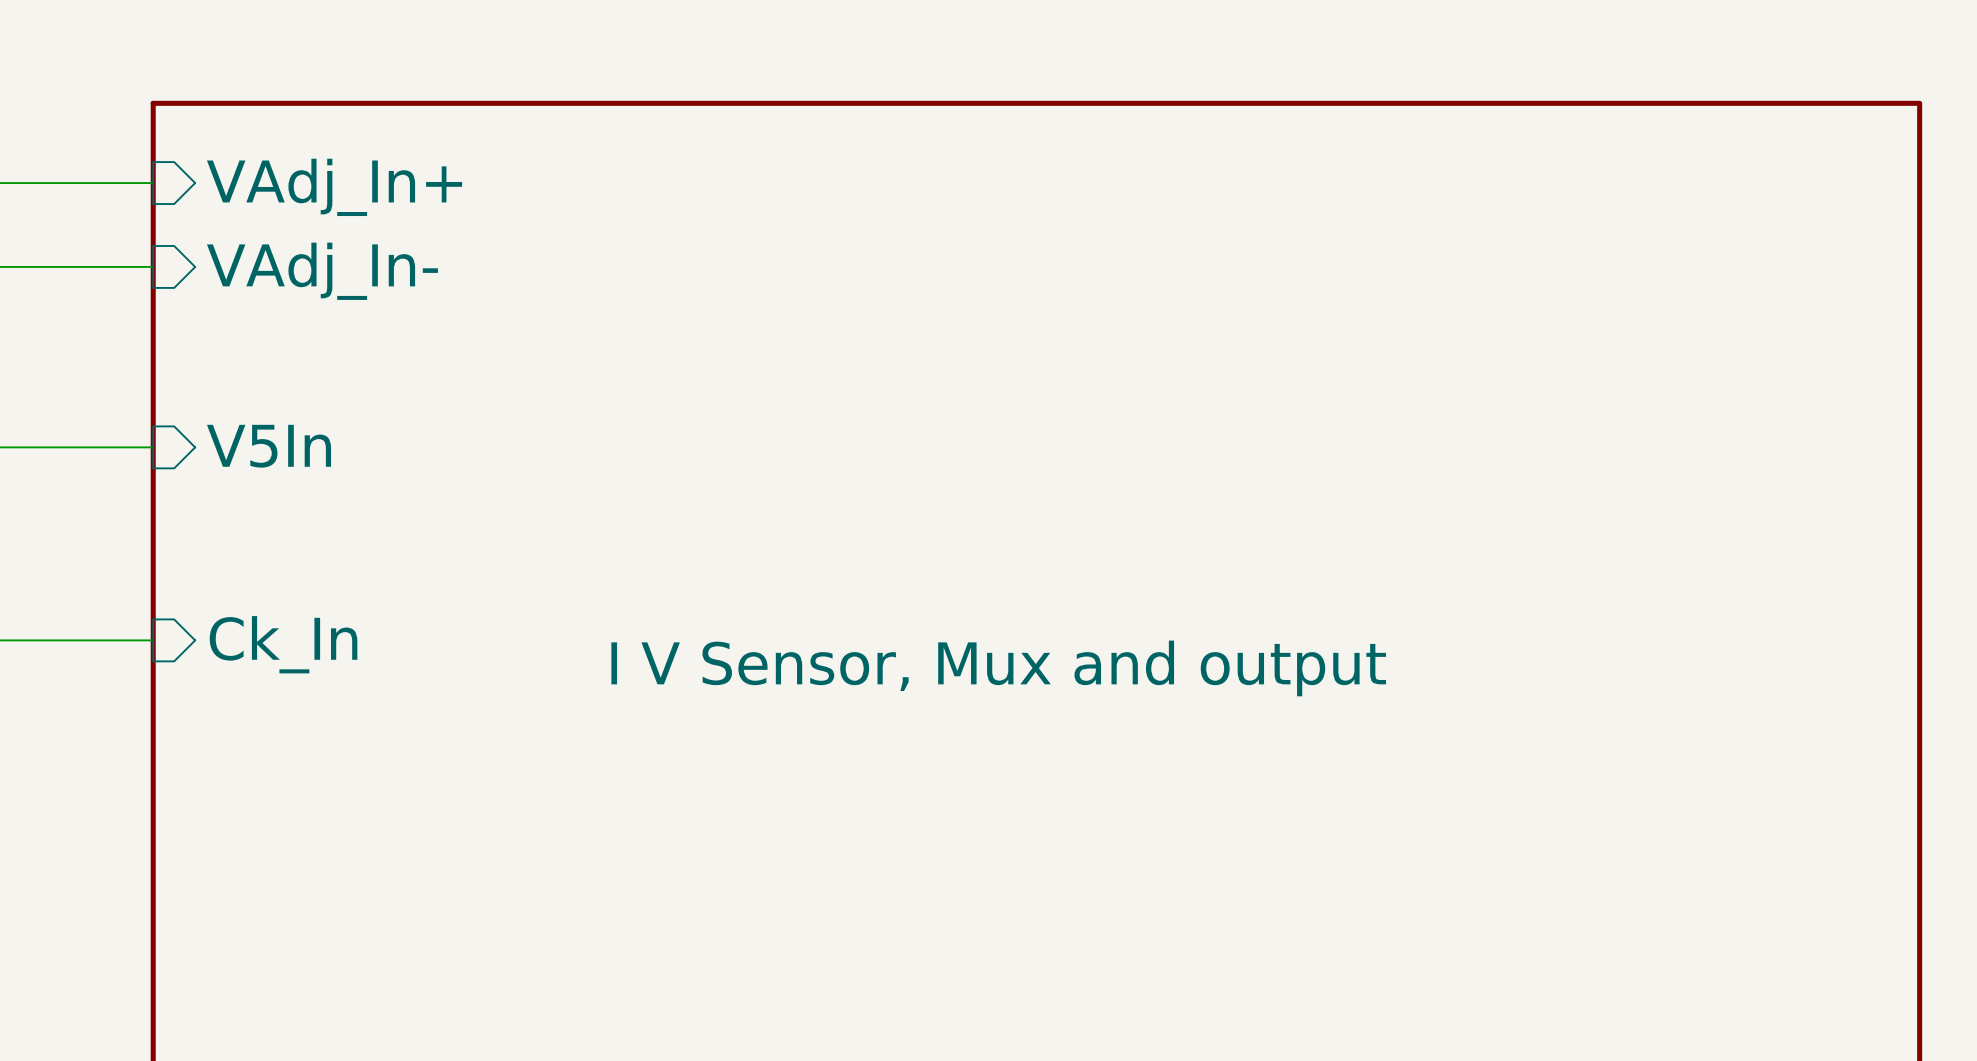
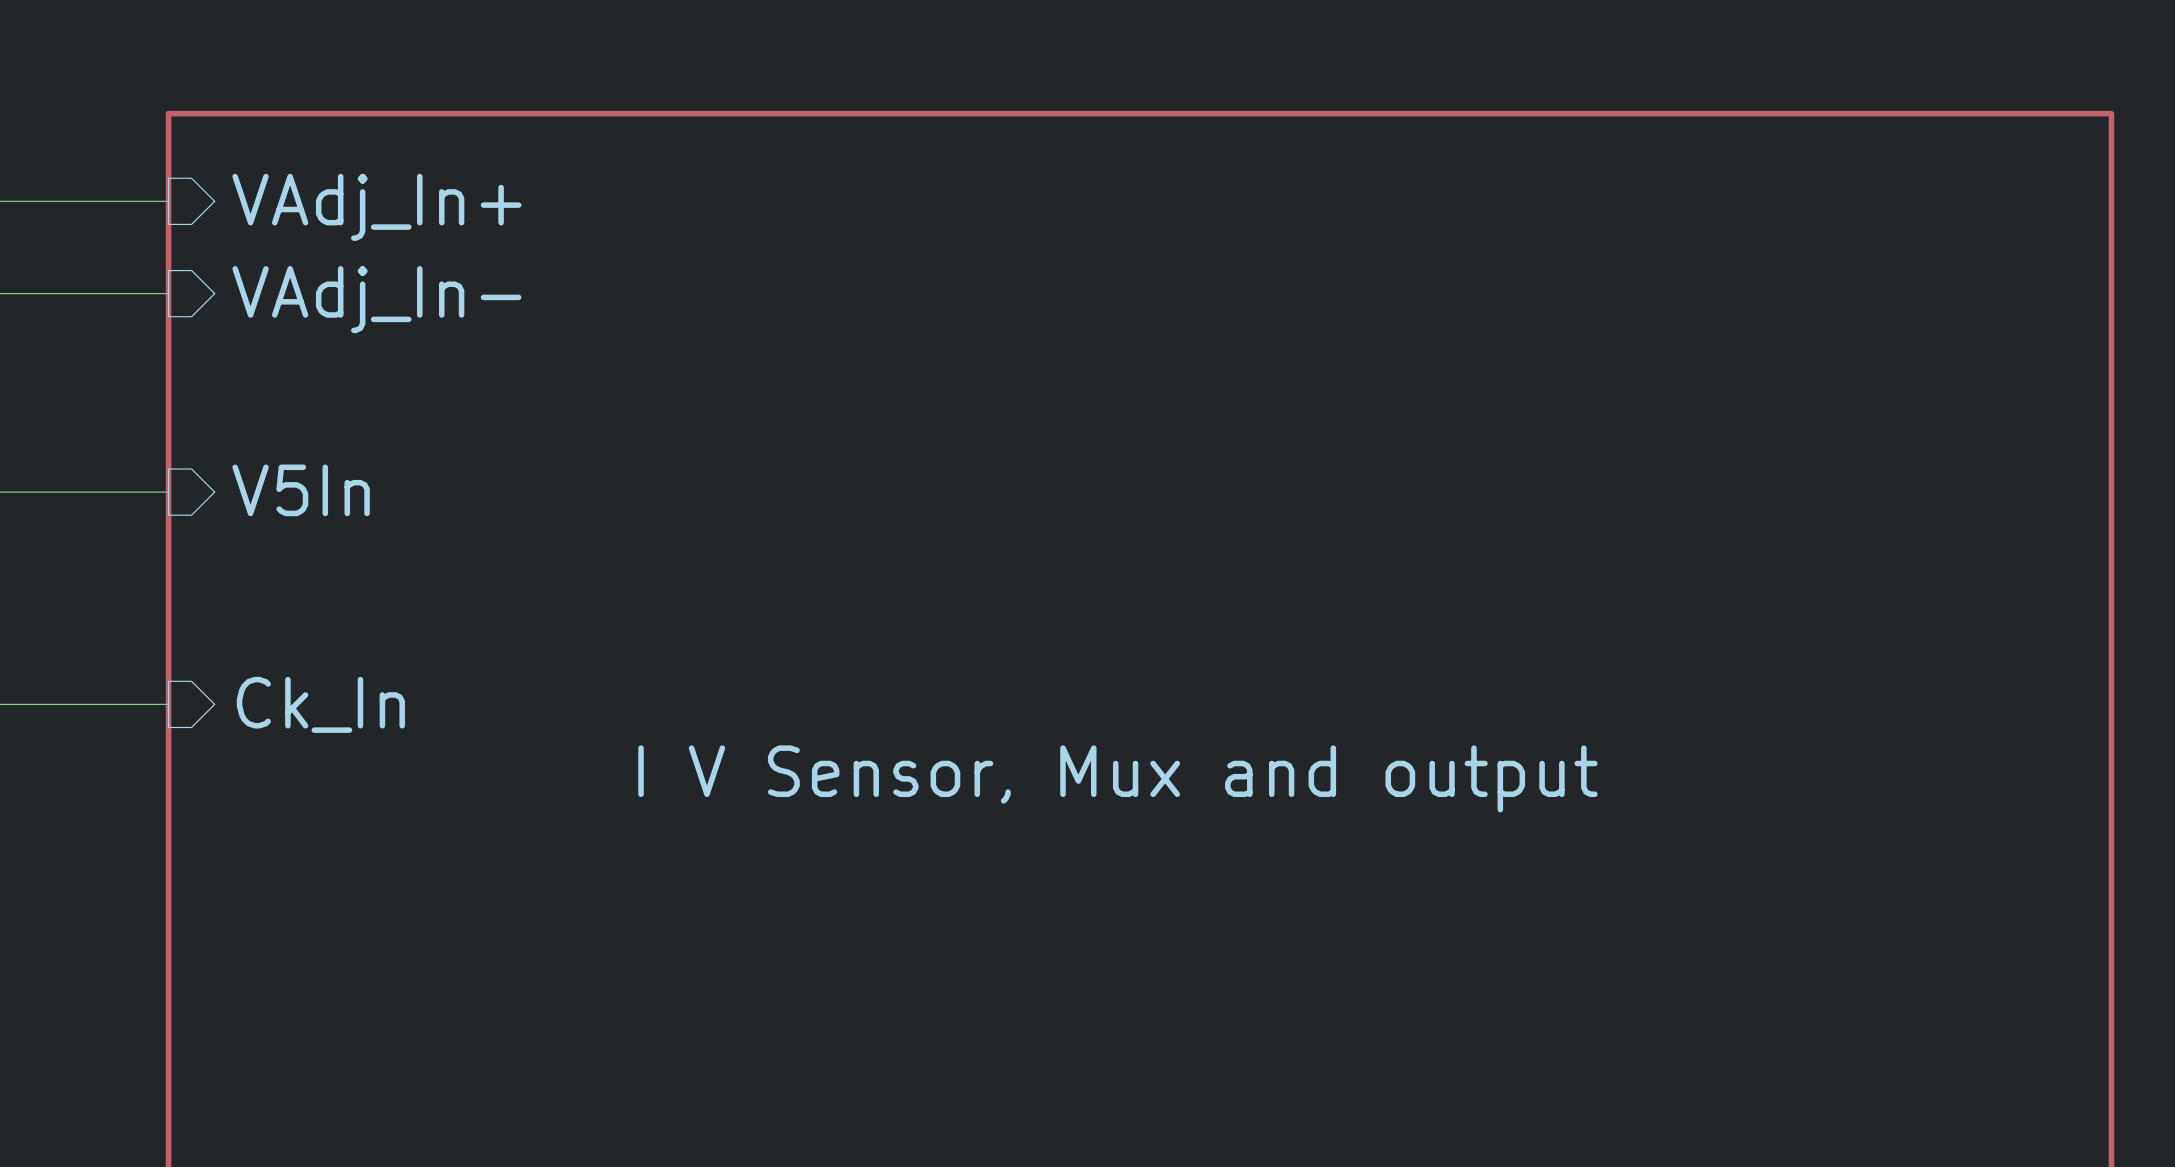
sheet I V Sensor, Mux and output name position: I V Sensor, Mux and output (998, 668) -> I V Sensor, Mux and output (1117, 778)

